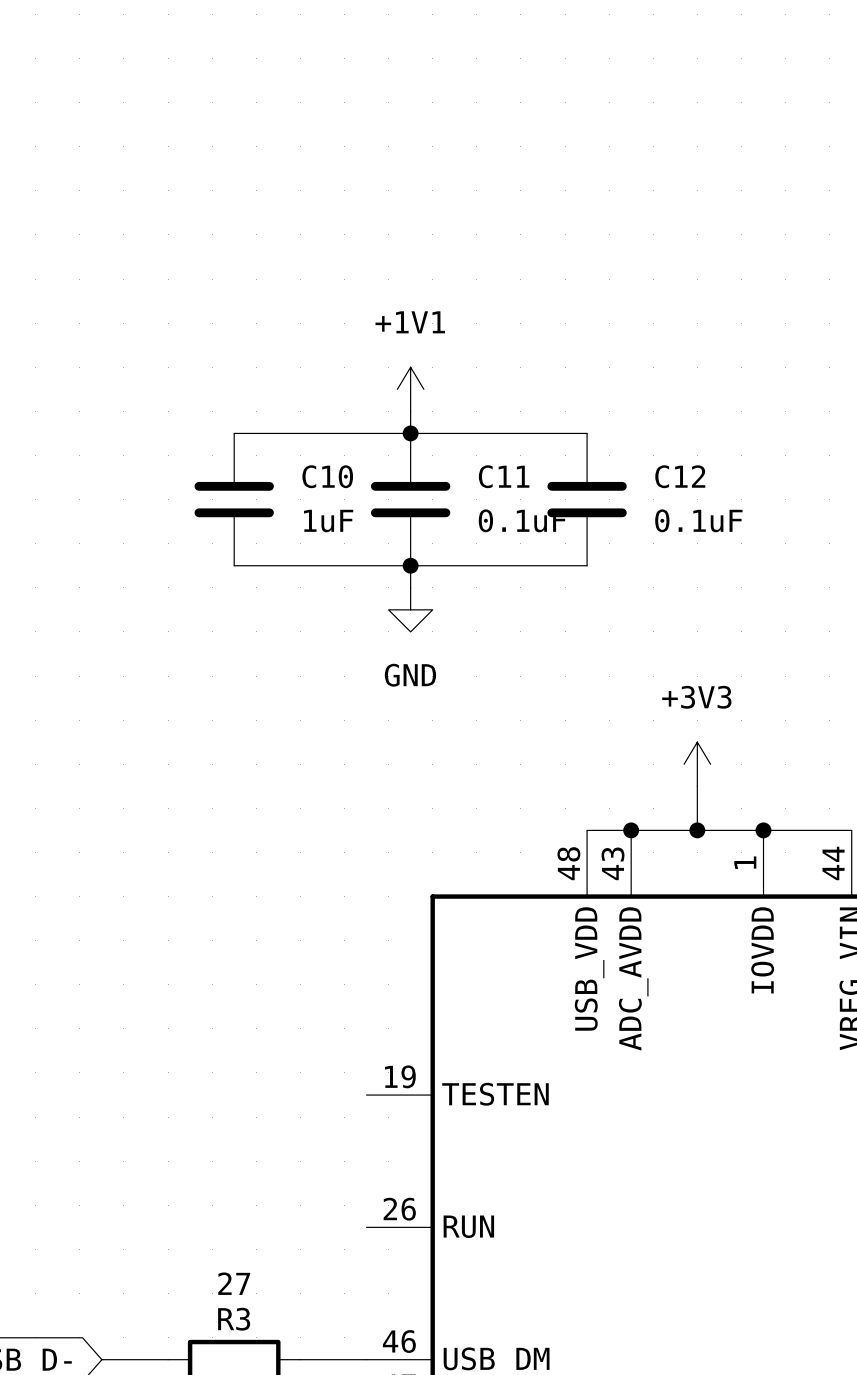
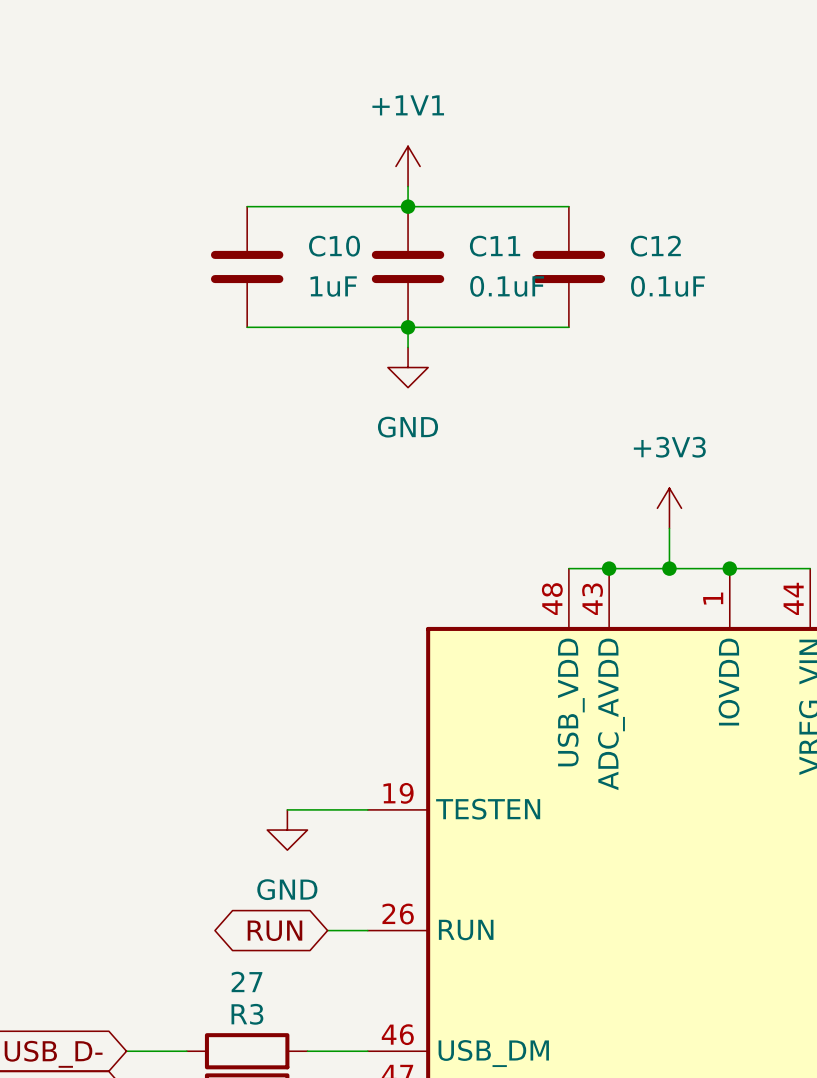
wire: none -> (287, 809) (367, 809)
power symbol: none -> GND (287, 830)
global label: none -> RUN (274, 930)
wire: none -> (327, 930) (367, 930)

